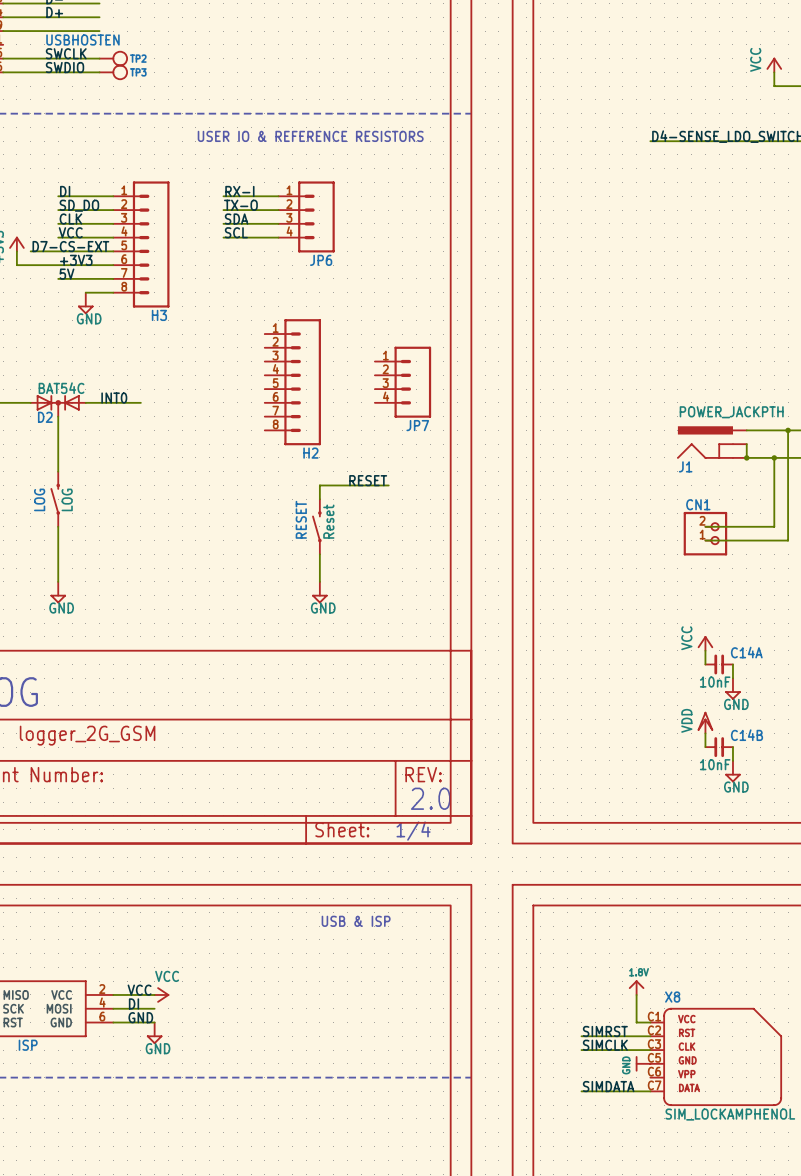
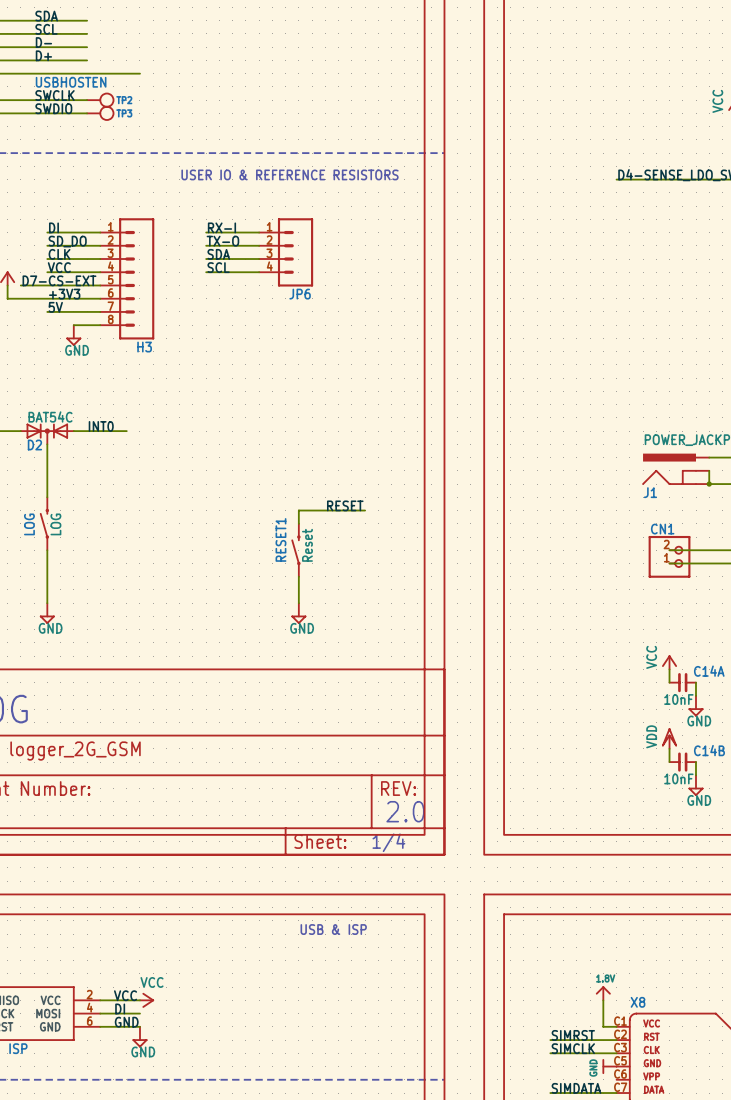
wire: none -> (87, 73) (139, 73)
H2: (292, 382) -> none
JP7: (403, 382) -> none
RESET name: RESET (301, 519) -> RESET1 (280, 539)

